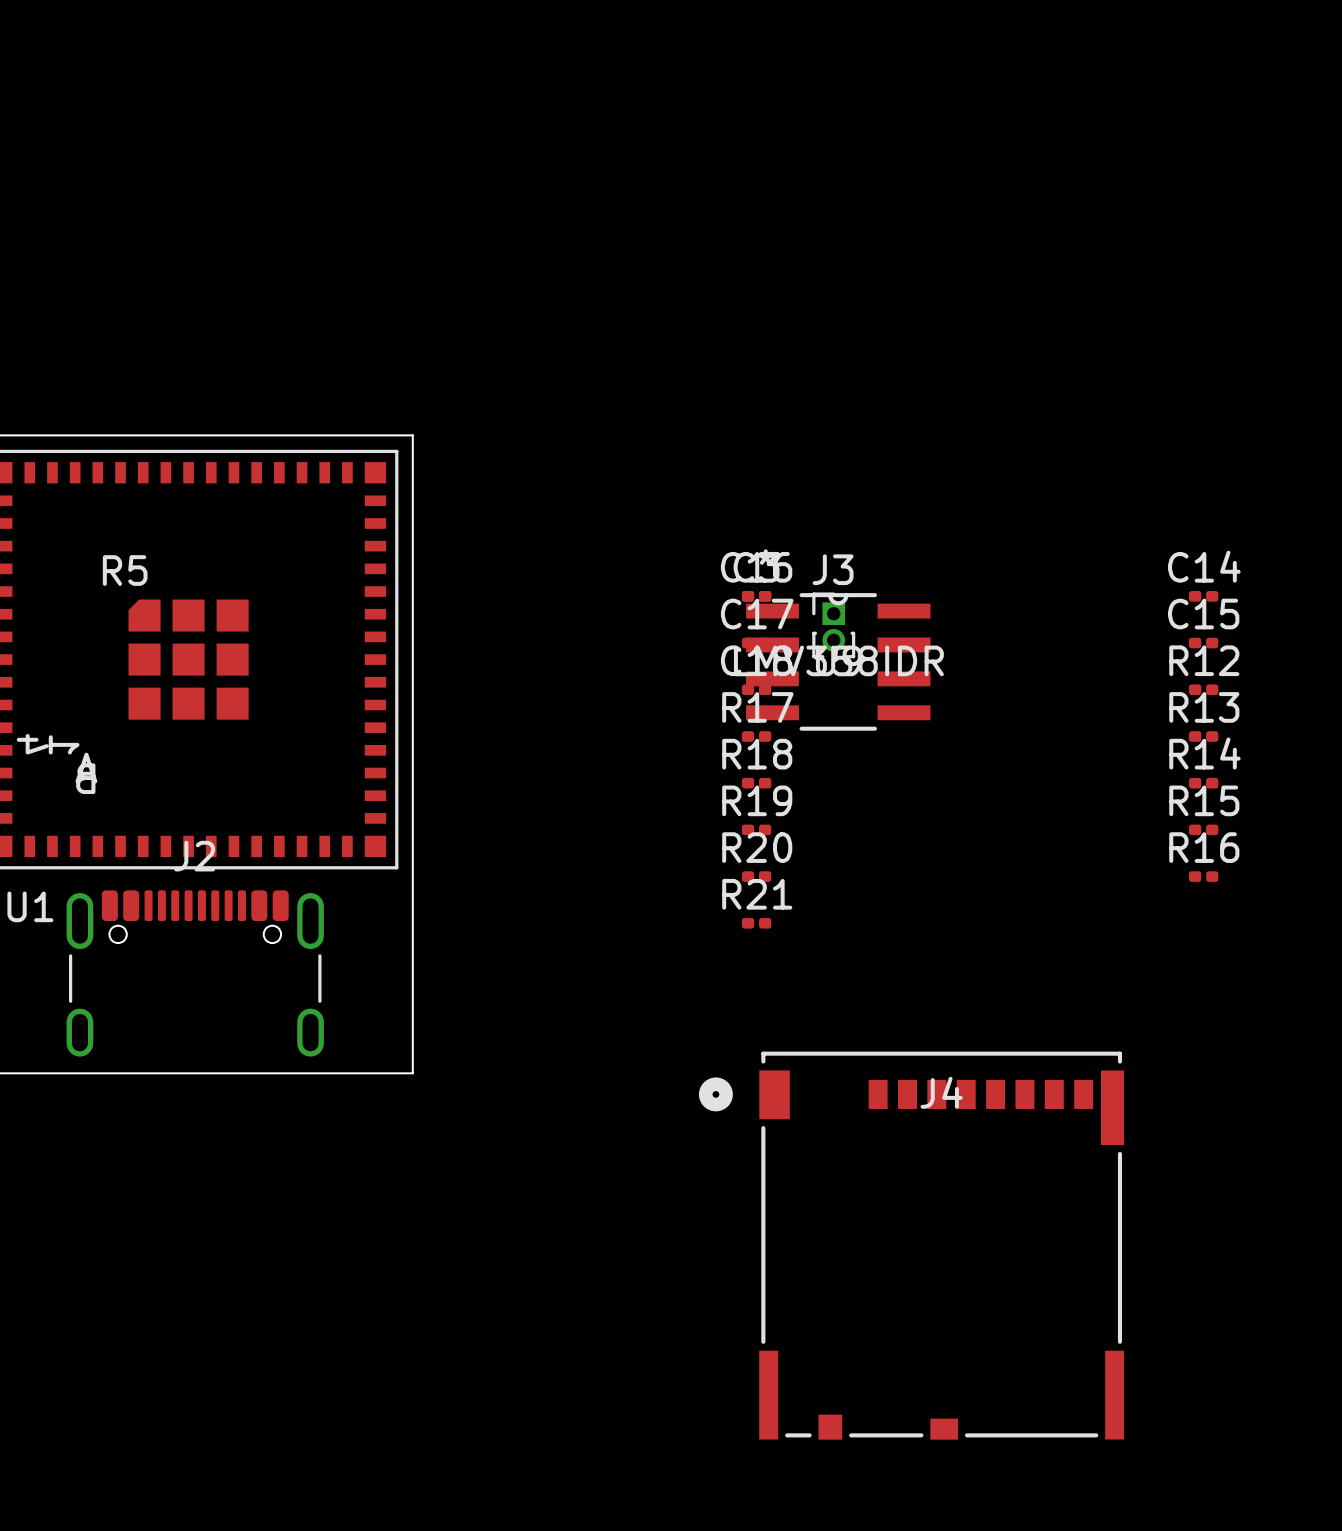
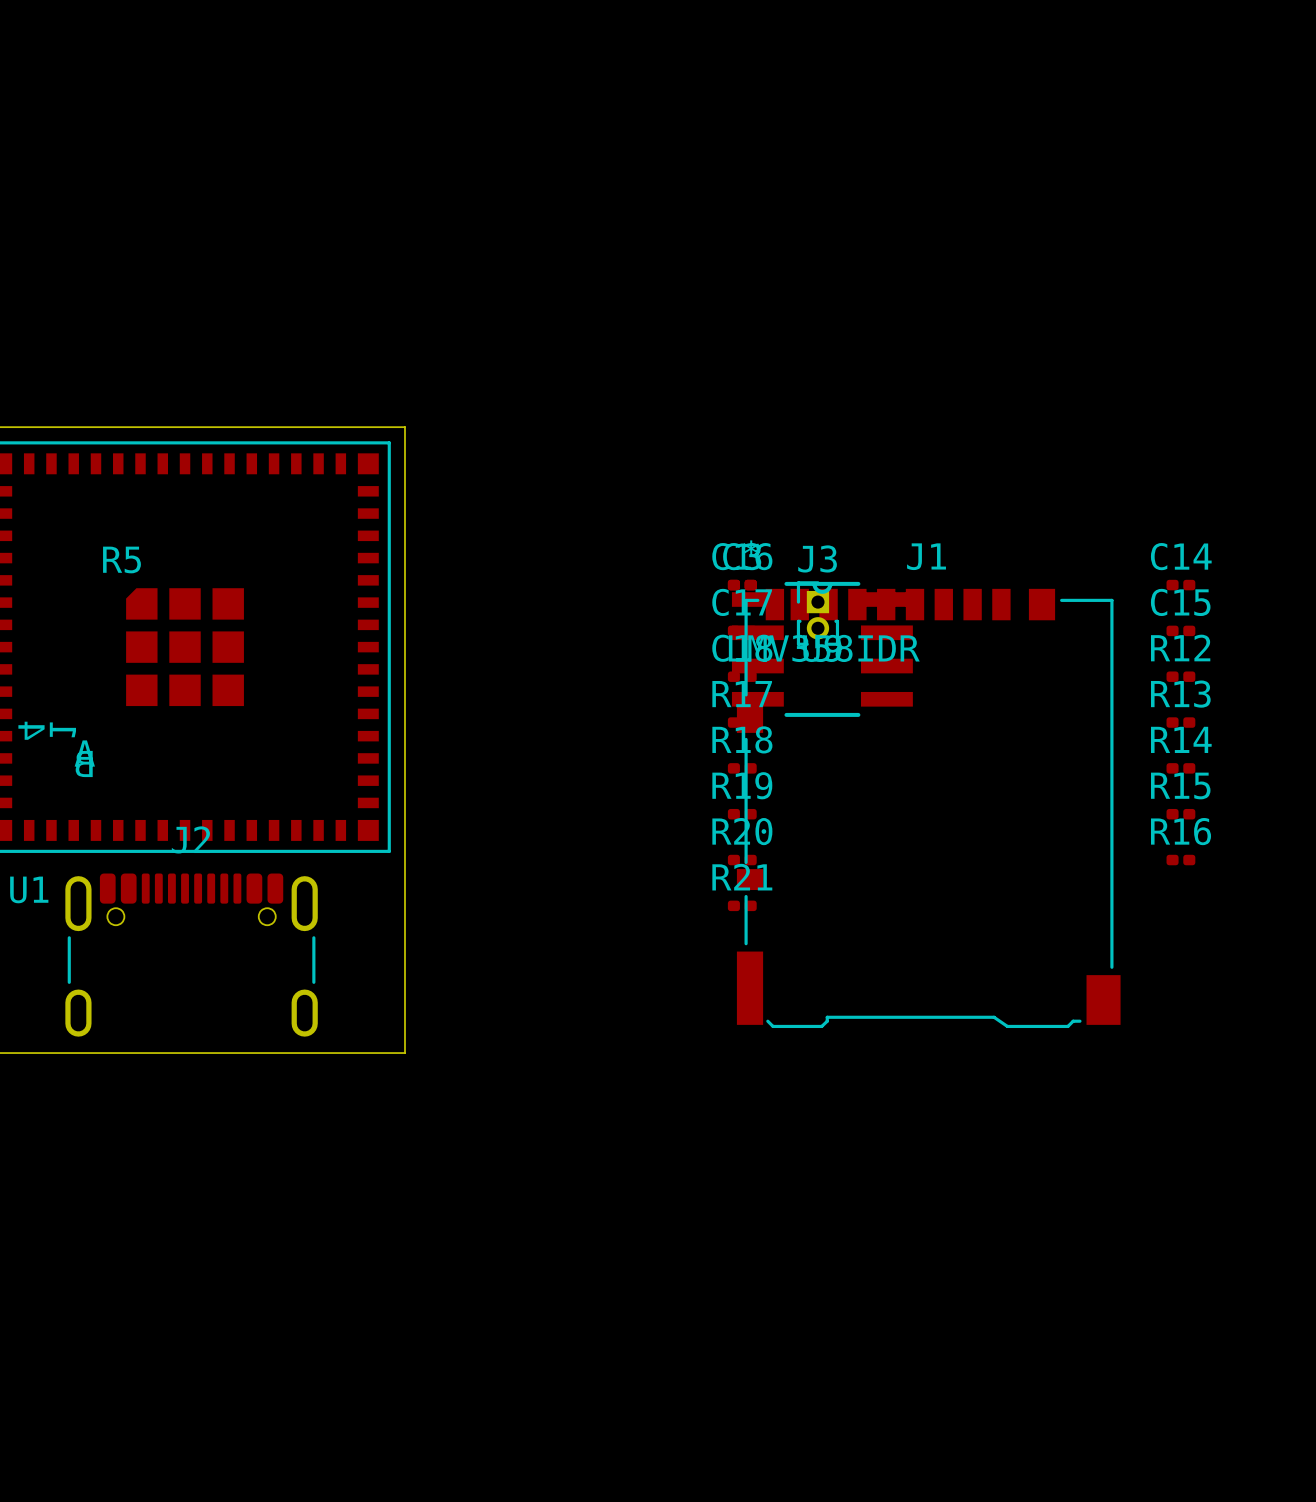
J1: none -> (928, 808)
J4: (911, 1245) -> none

